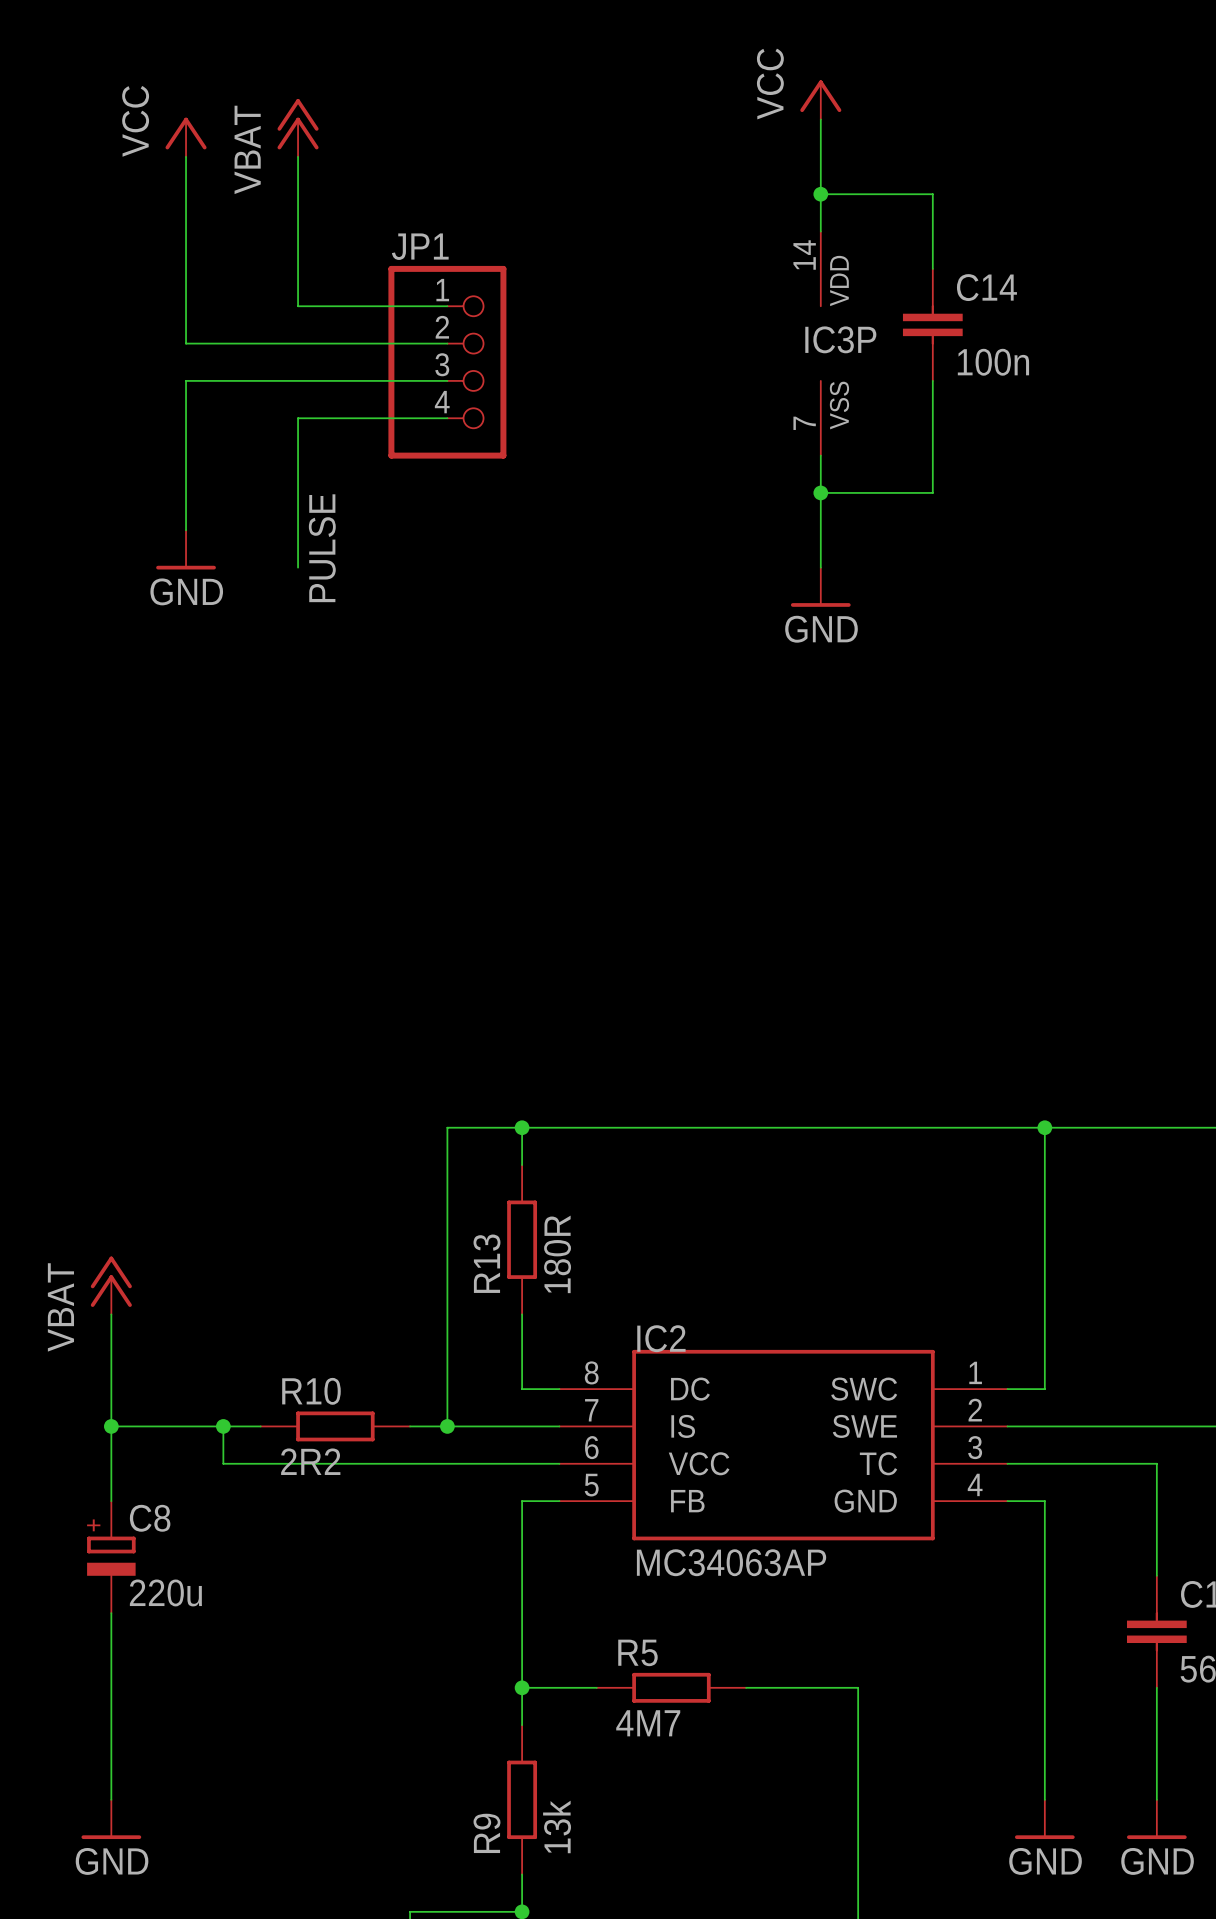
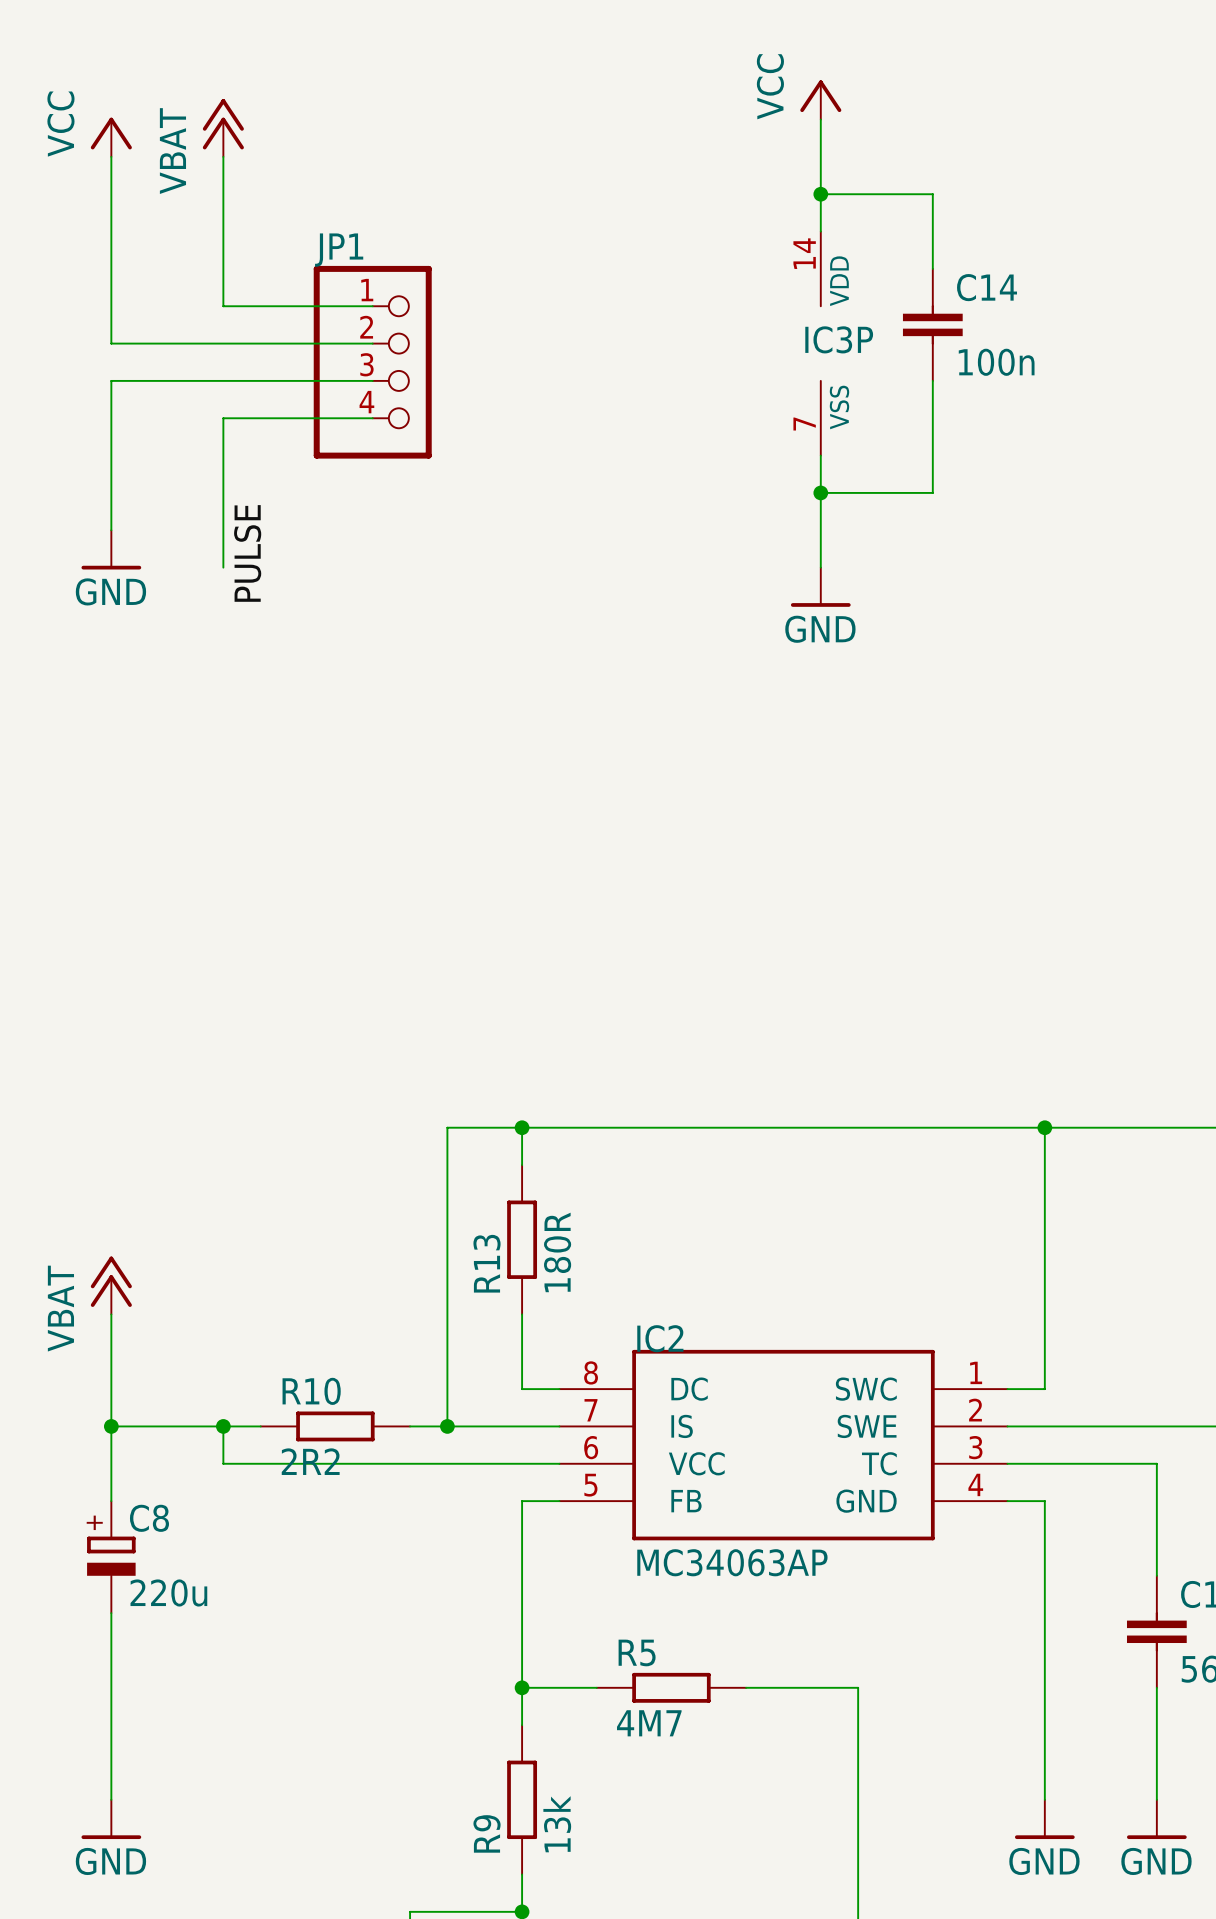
power symbol position: VBAT (298, 127) -> VBAT (223, 127)
power symbol position: VCC (186, 137) -> VCC (111, 137)
wire: (186, 156) (186, 343) -> (111, 156) (111, 343) (186, 343)
wire: (298, 156) (298, 306) -> (223, 156) (223, 306) (298, 306)
wire: (372, 306) (447, 306) -> none
wire: (372, 343) (447, 343) -> none
JP1 position: (447, 362) -> (372, 362)
wire: (186, 380) (186, 530) -> (186, 380) (111, 380) (111, 530)
wire: (372, 380) (447, 380) -> none
wire: (298, 418) (298, 567) -> (298, 418) (223, 418) (223, 567)
wire: (372, 418) (447, 418) -> none
label position: PULSE (322, 548) -> PULSE (247, 553)
power symbol position: GND (186, 549) -> GND (111, 549)

